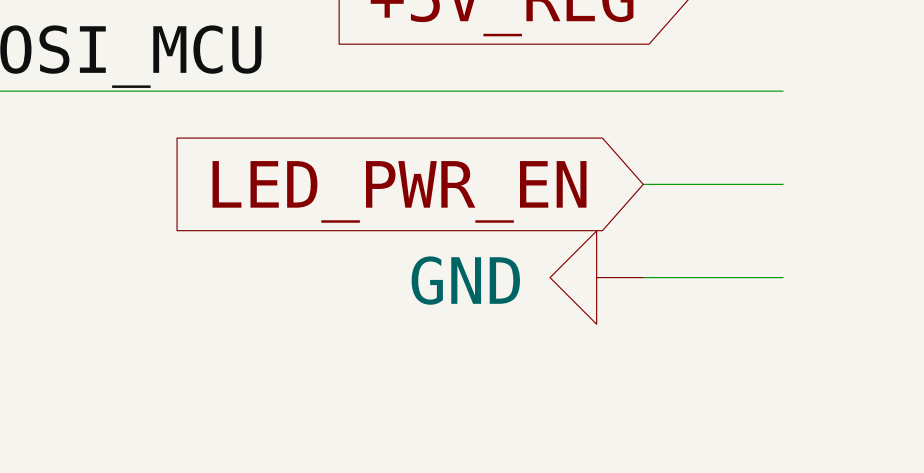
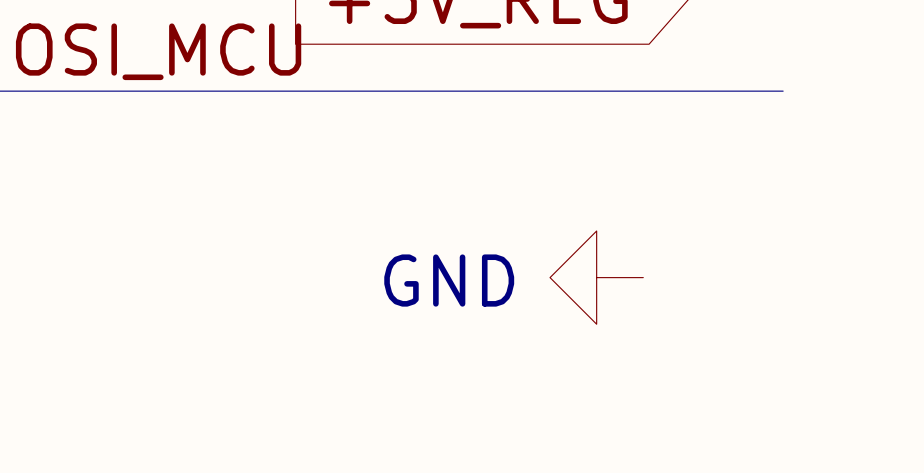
wire: (643, 184) (783, 184) -> none
global label: LED_PWR_EN (399, 191) -> none
wire: (643, 277) (783, 277) -> none

